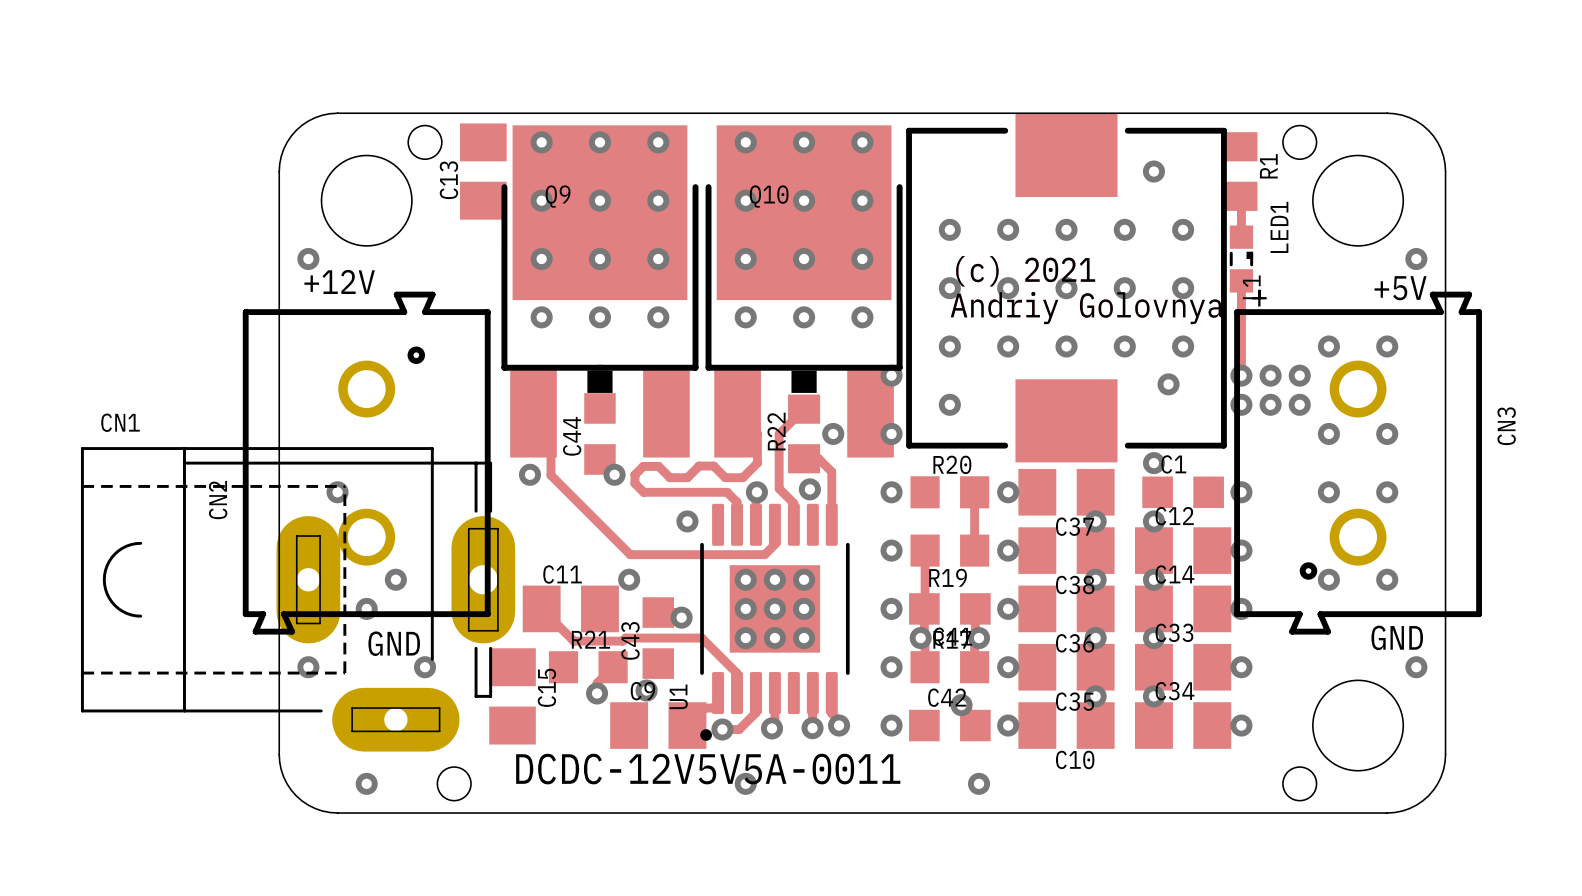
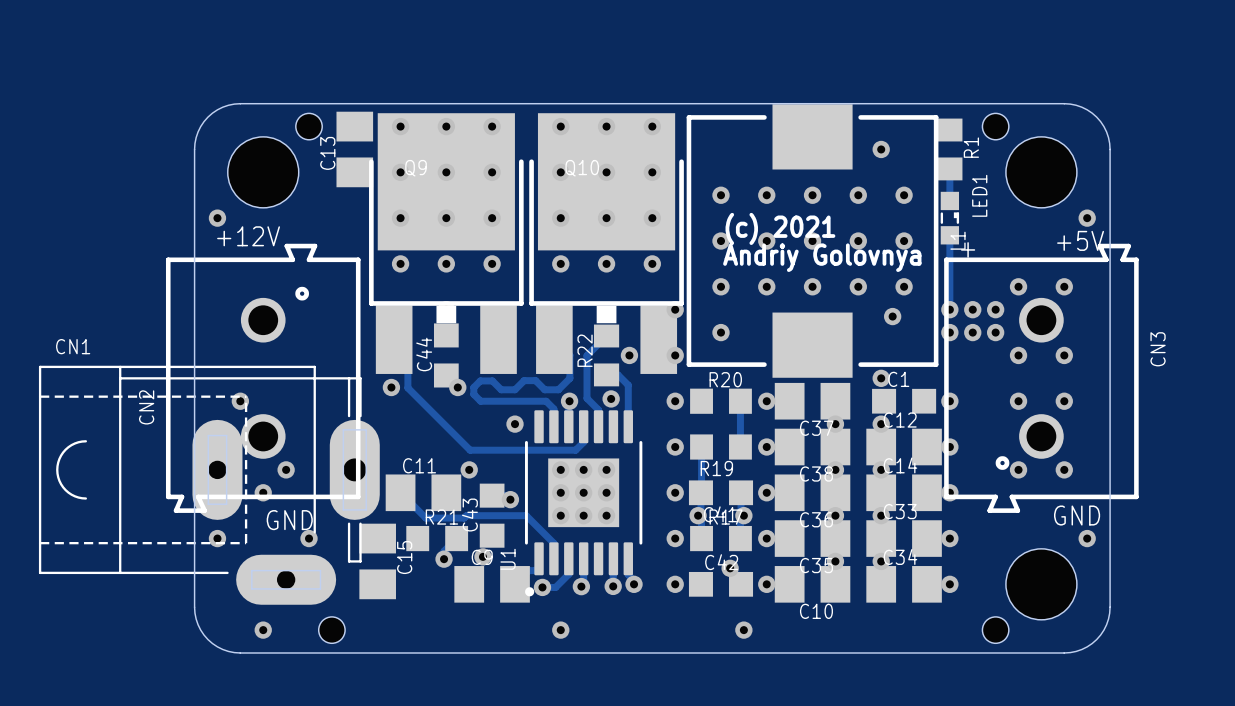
text: DCDC-12V5V5A-0011 (708, 769) -> none

